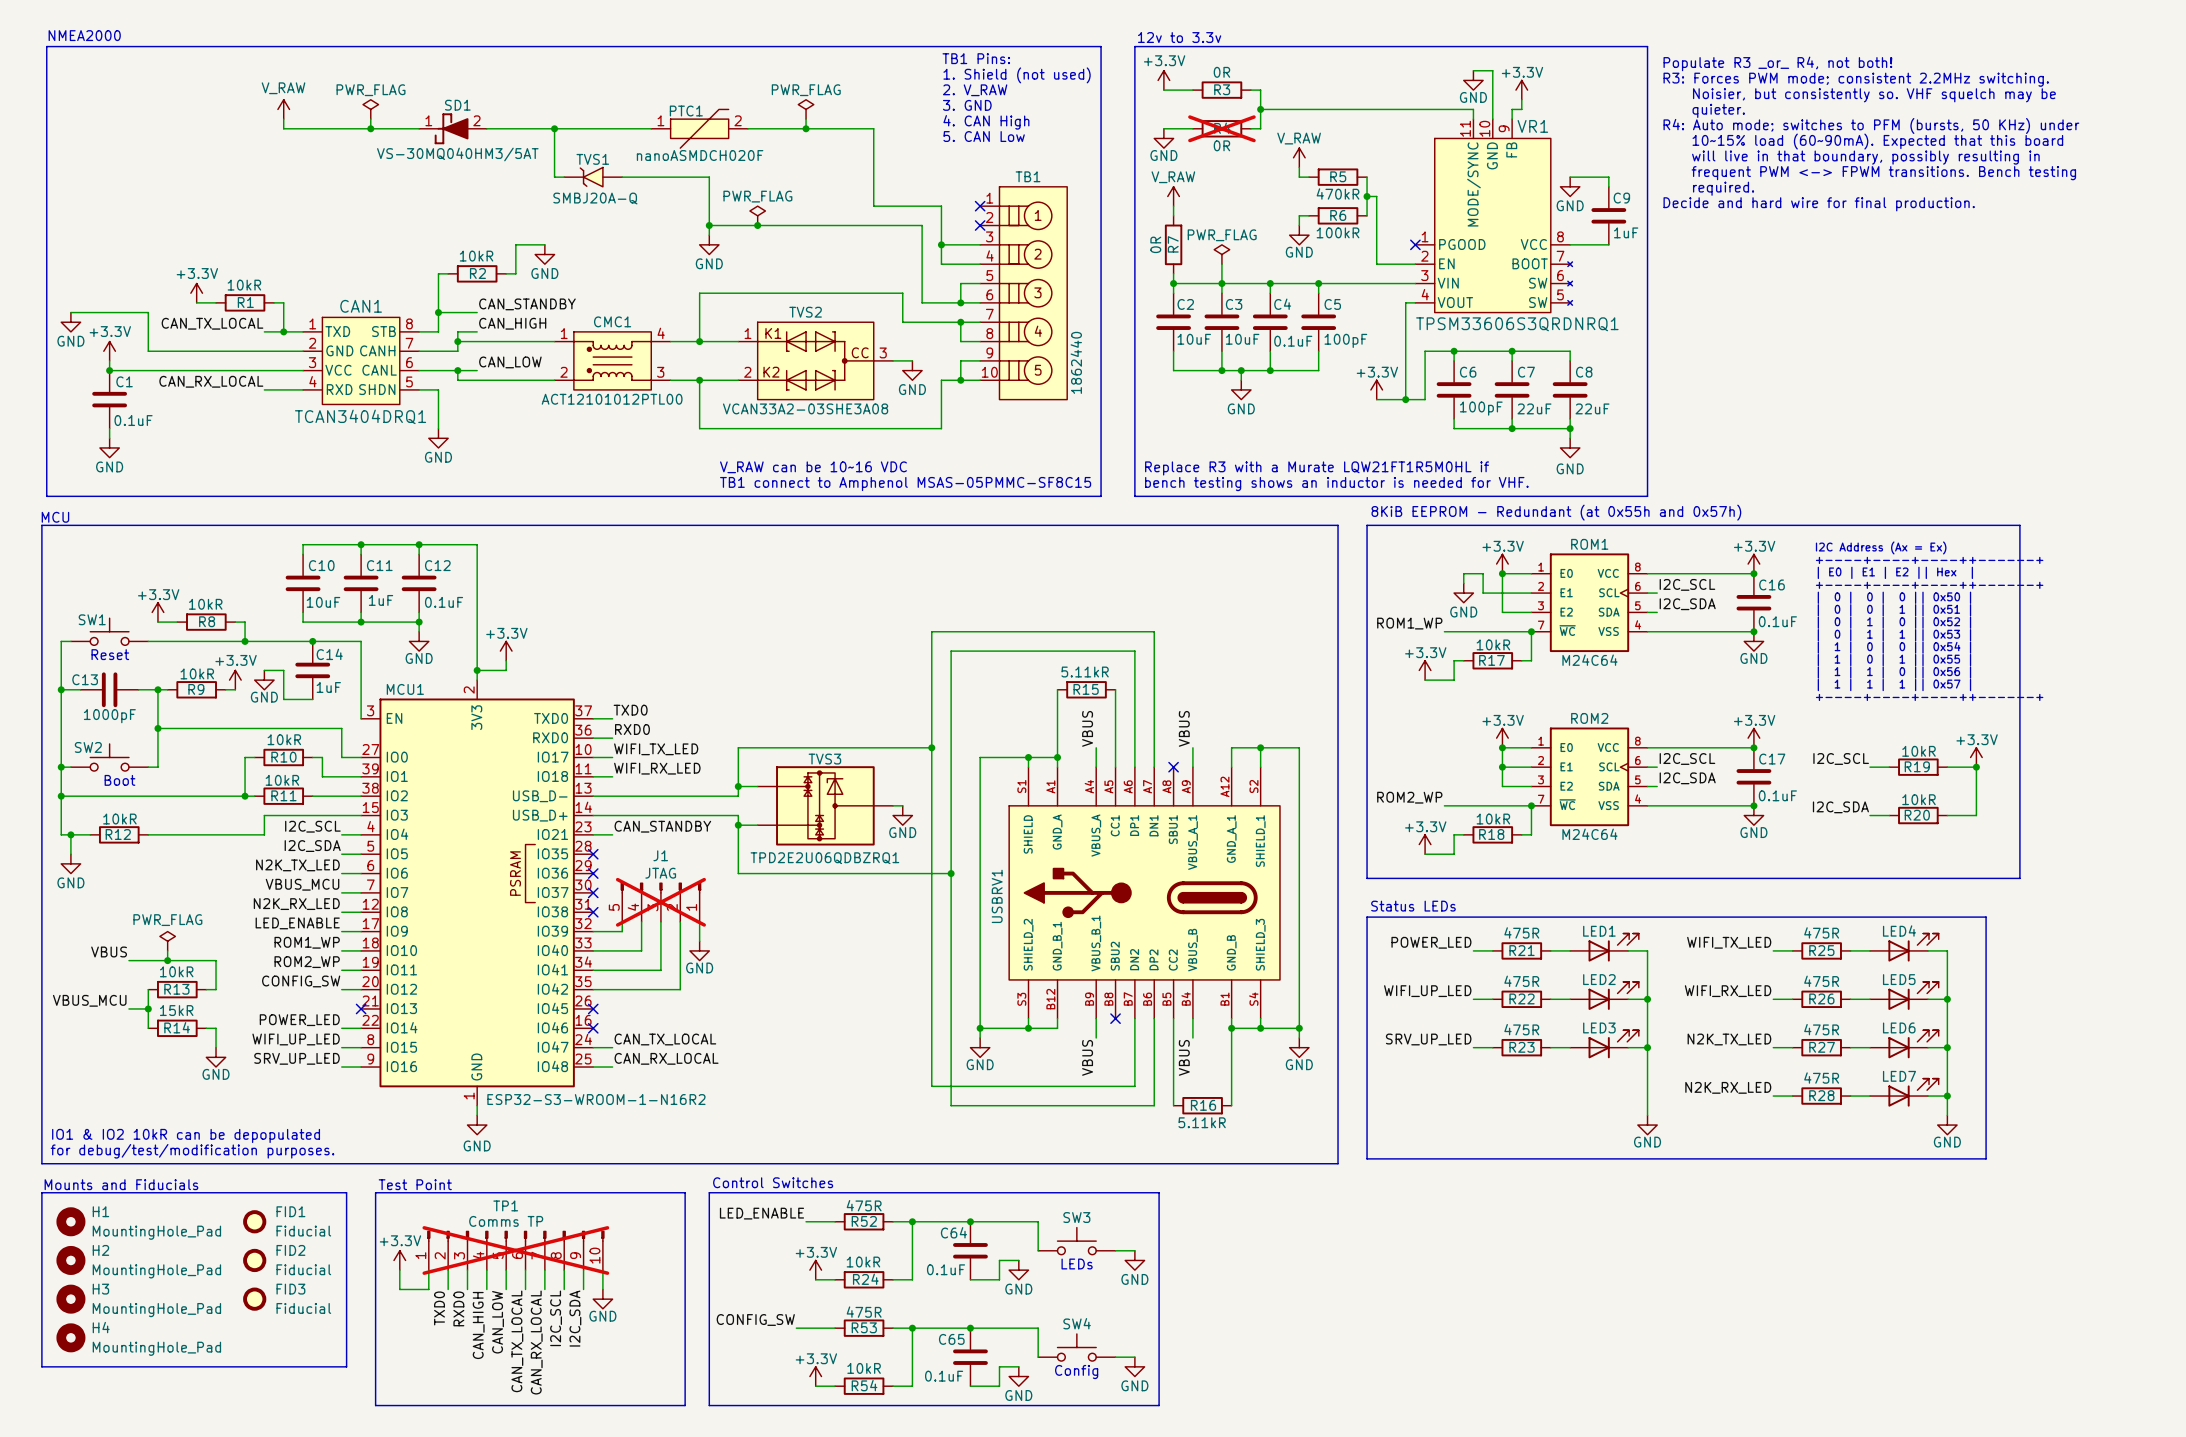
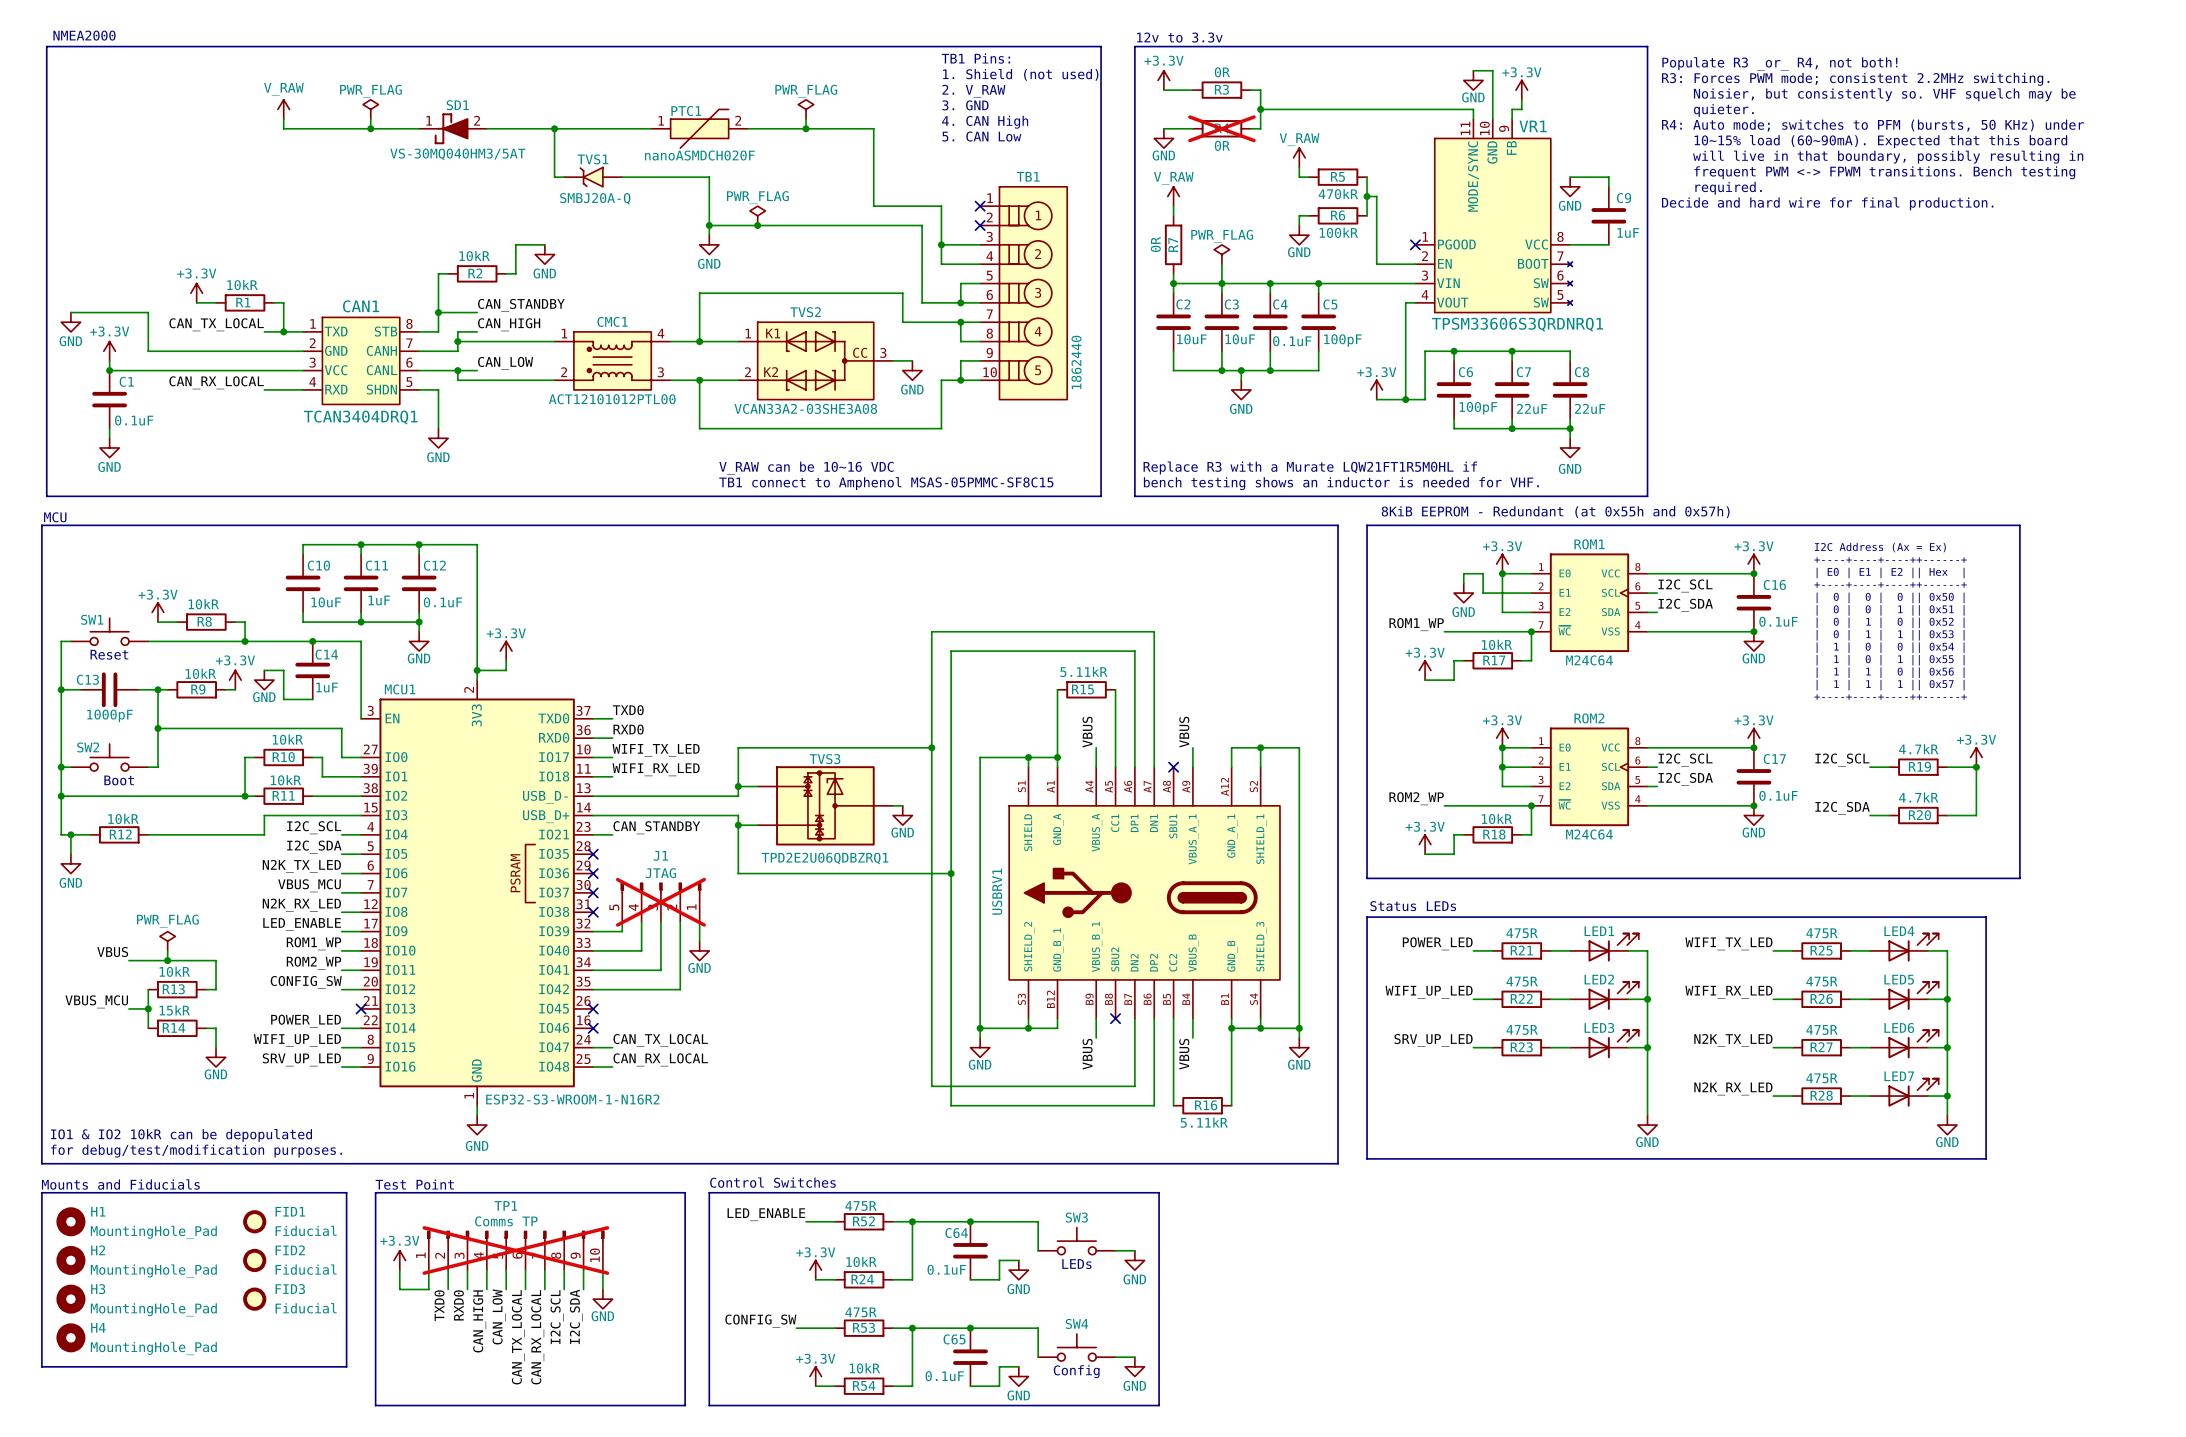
R19 value: 10kR (1918, 751) -> 4.7kR (1918, 749)
R20 value: 10kR (1918, 799) -> 4.7kR (1918, 797)

